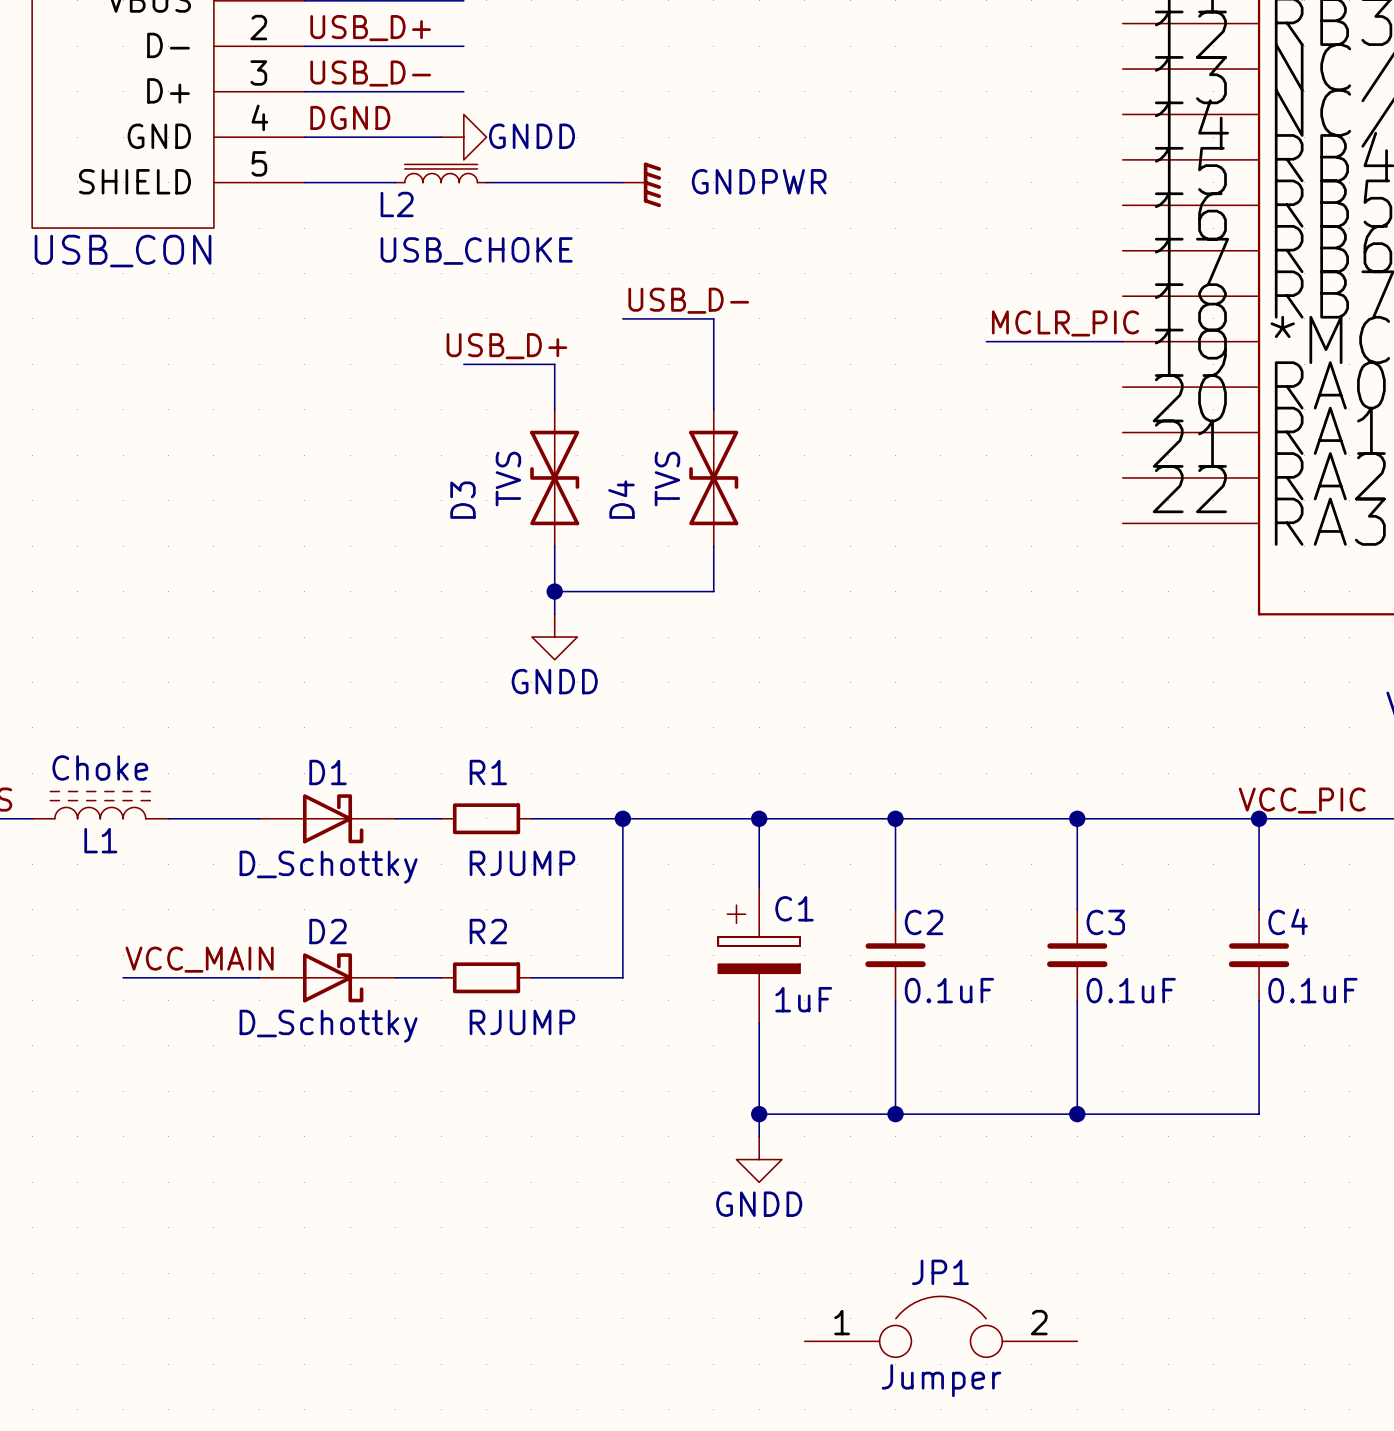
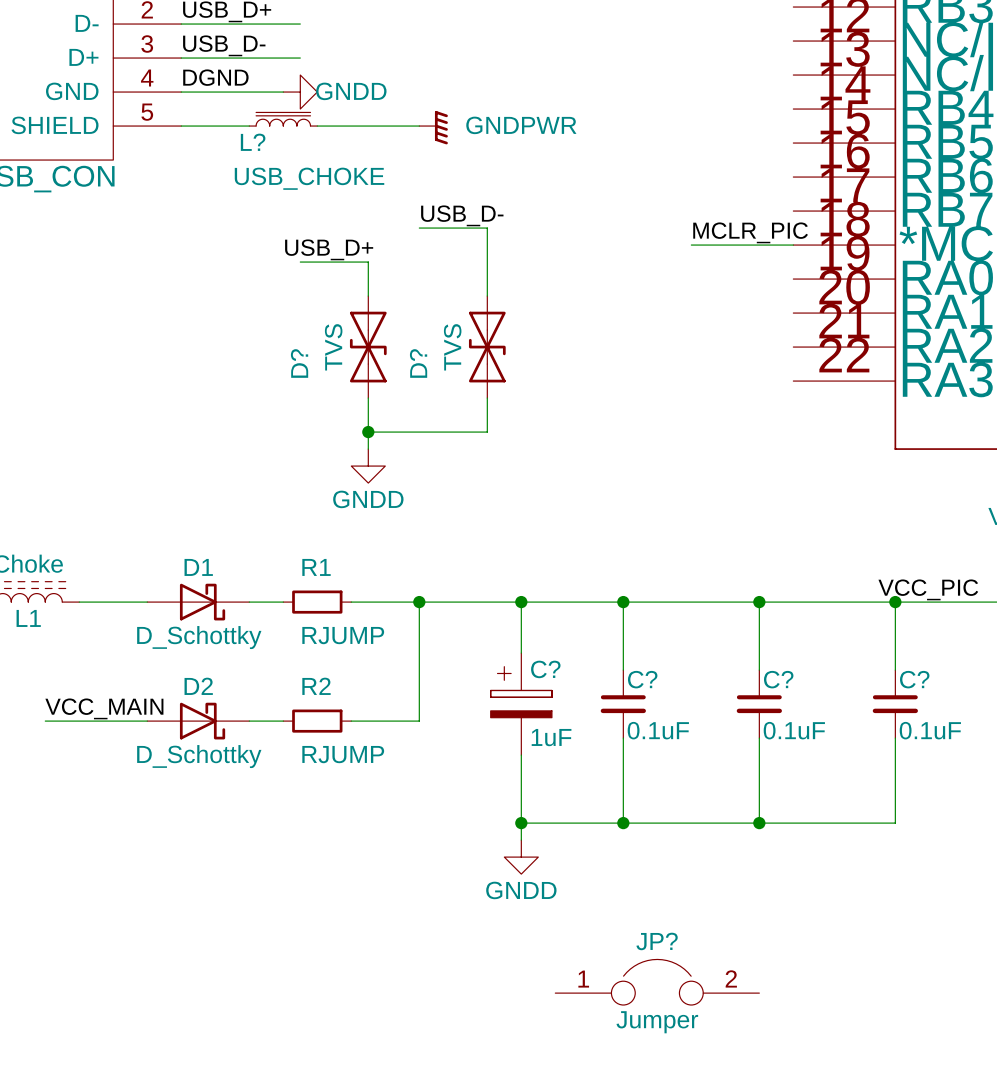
L2 name: L2 (397, 204) -> L? (253, 142)
D4 name: D4 (621, 499) -> D? (418, 363)
D3 name: D3 (462, 500) -> D? (299, 363)
C1 name: C1 (794, 908) -> C? (545, 669)
C4 name: C4 (1288, 921) -> C? (914, 679)
C2 name: C2 (924, 922) -> C? (642, 679)
C3 name: C3 (1105, 922) -> C? (778, 679)
JP1 name: JP1 (940, 1272) -> JP? (657, 941)

